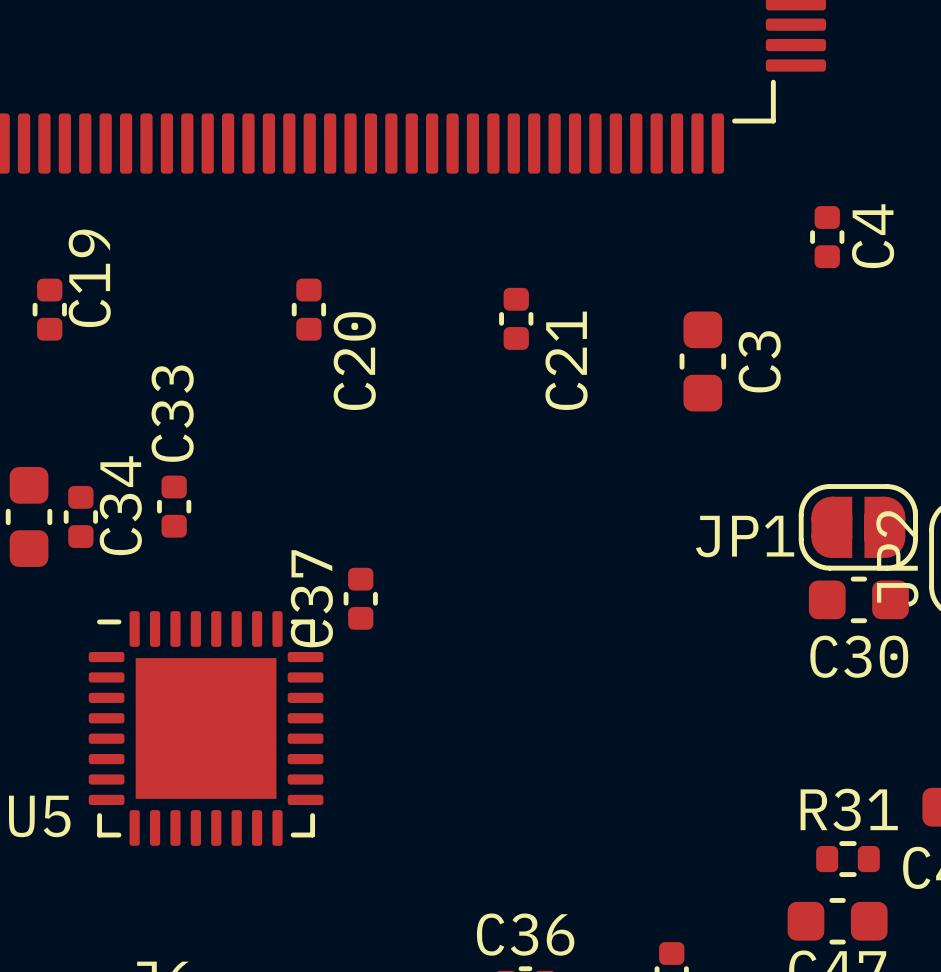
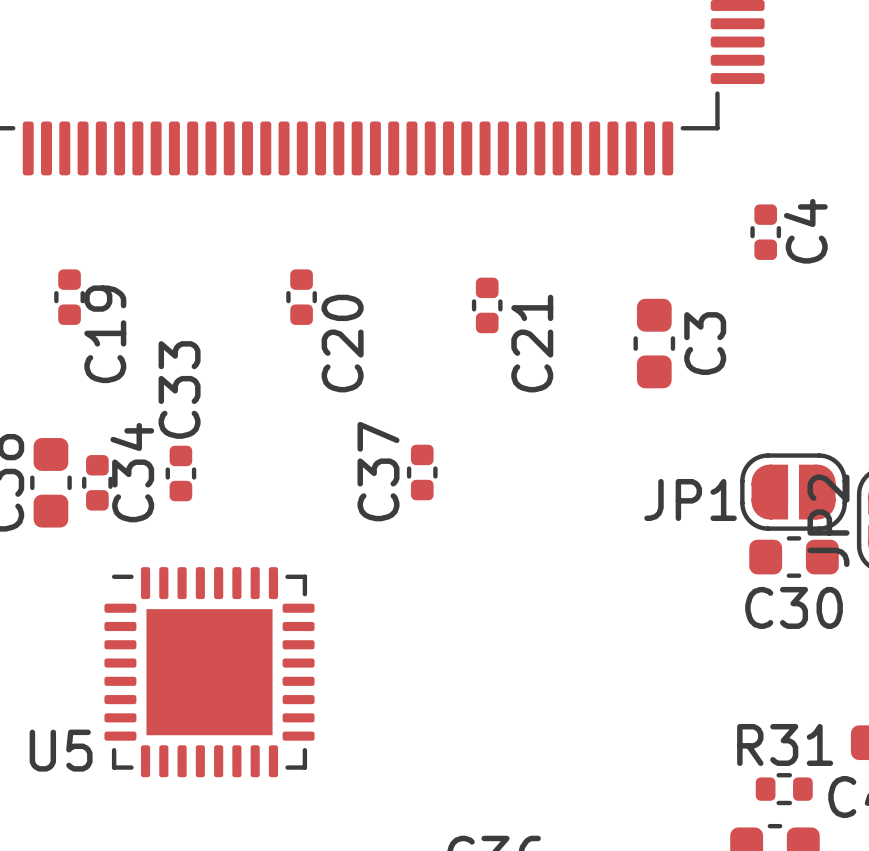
C19 name position: C19 (89, 278) -> C19 (105, 334)
C37 position: (360, 598) -> (422, 472)

